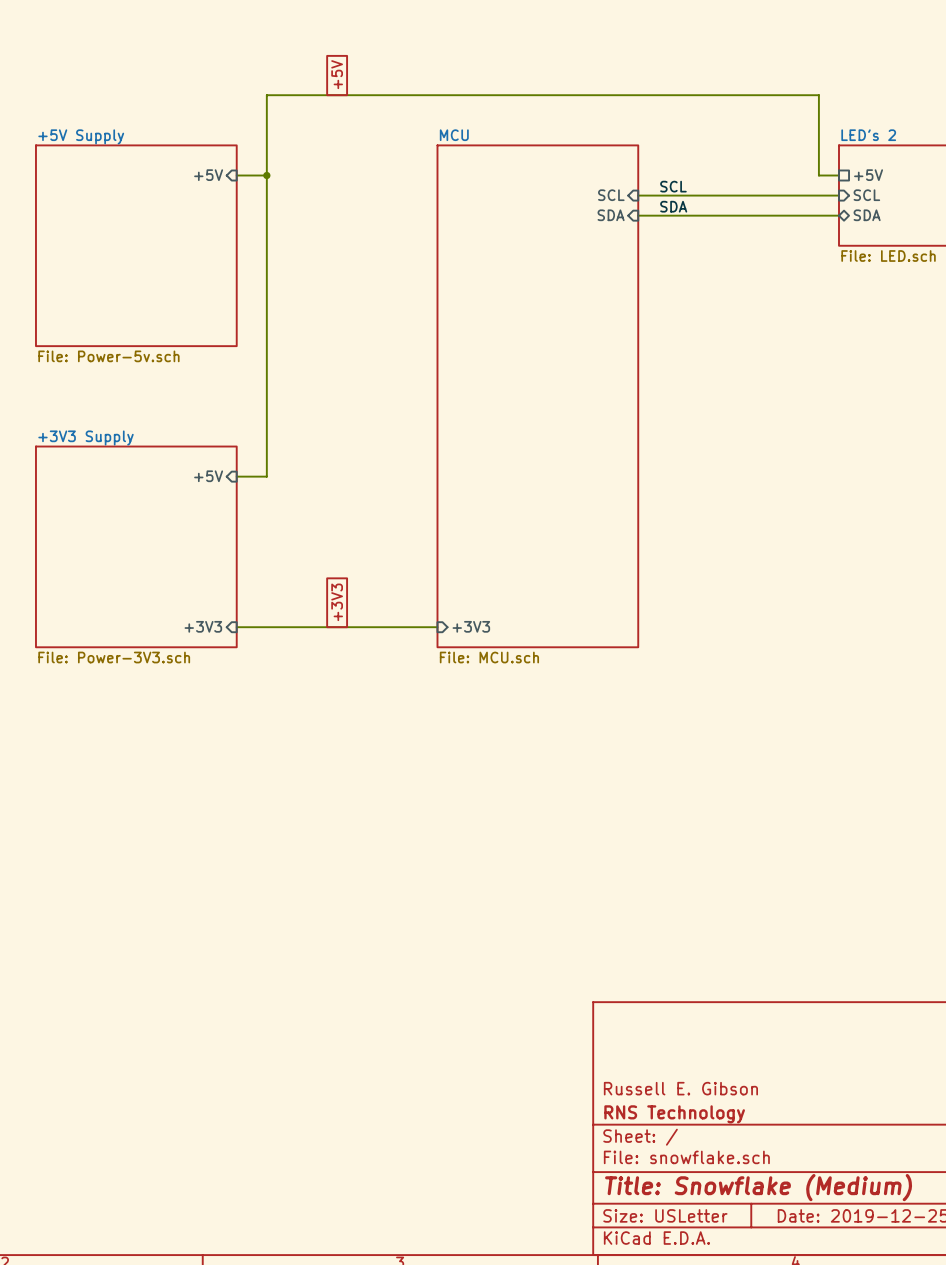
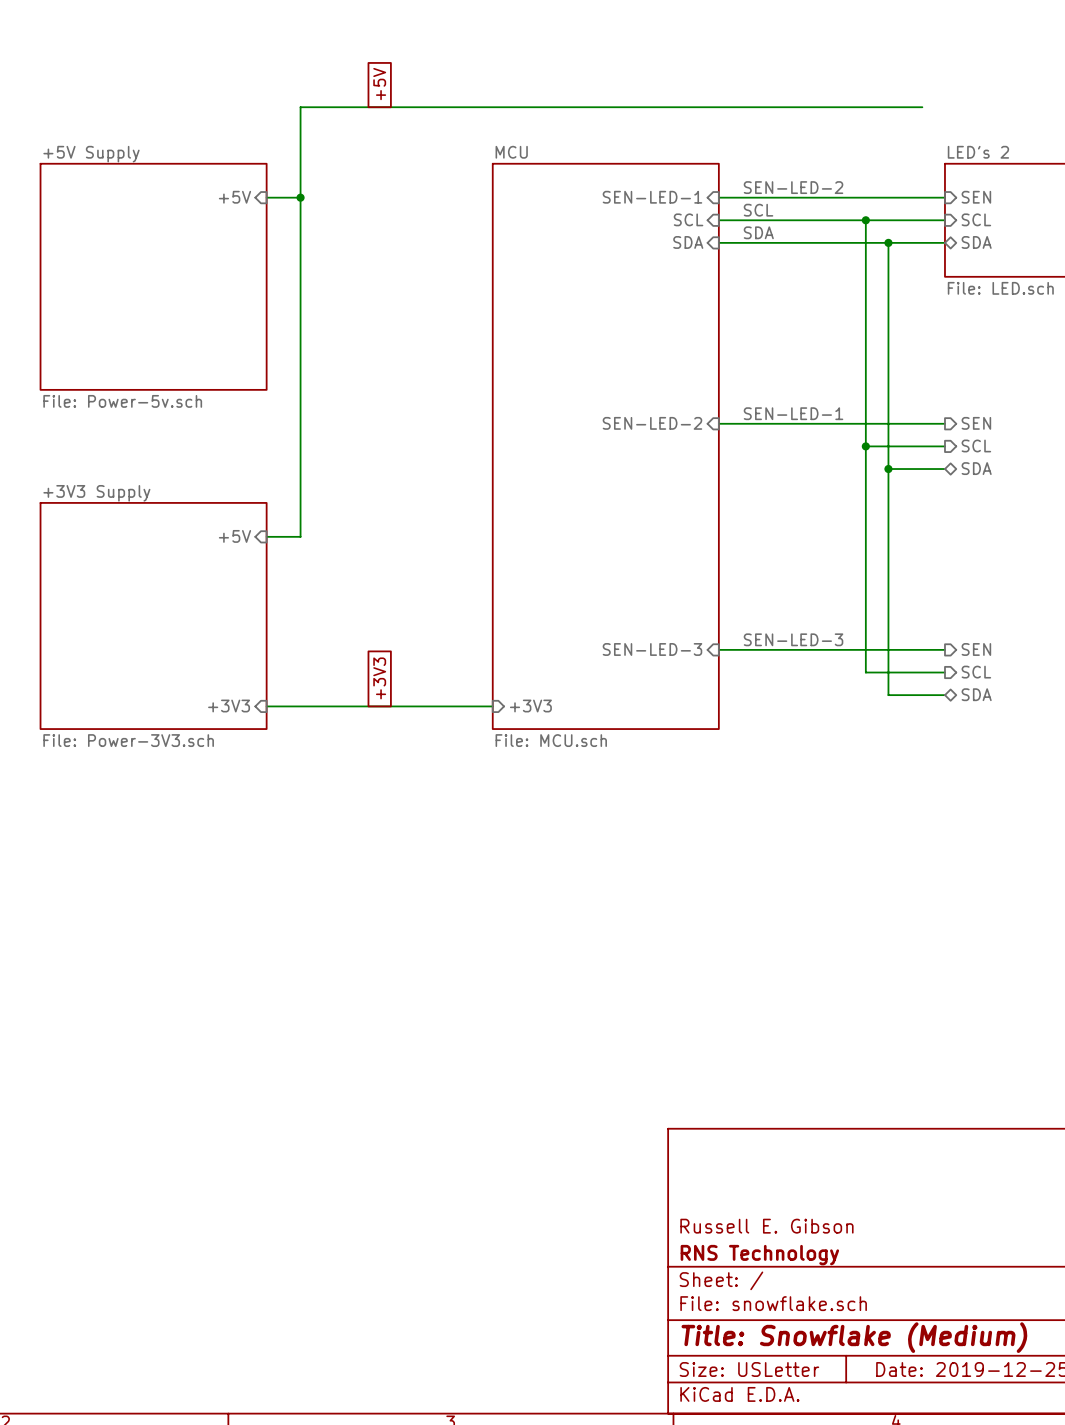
wire: (818, 95) (818, 175) -> (718, 197) (922, 197)
label: none -> SEN-LED-2 (793, 187)
sheet pin: none -> SEN-LED-1 (652, 197)
sheet pin shape: passive (868, 175) -> input (976, 197)
sheet pin: +5V (868, 175) -> SEN (976, 197)
wire: none -> (865, 220) (865, 672) (944, 672)
junction: none -> (865, 220)
wire: none -> (888, 242) (888, 695) (944, 695)
junction: none -> (888, 242)
label: none -> SEN-LED-1 (793, 413)
sheet pin: none -> SEN-LED-2 (652, 423)
sheet pin: none -> SEN (976, 423)
wire: none -> (718, 423) (944, 423)
sheet pin: none -> SCL (976, 445)
wire: none -> (865, 446) (944, 446)
junction: none -> (865, 446)
wire: none -> (888, 469) (944, 469)
junction: none -> (888, 469)
sheet pin: none -> SDA (976, 468)
label: none -> SEN-LED-3 (793, 639)
sheet pin: none -> SEN-LED-3 (652, 649)
sheet pin: none -> SEN (976, 649)
wire: none -> (718, 649) (944, 649)
sheet pin: none -> SCL (976, 672)
sheet pin: none -> SDA (976, 694)

